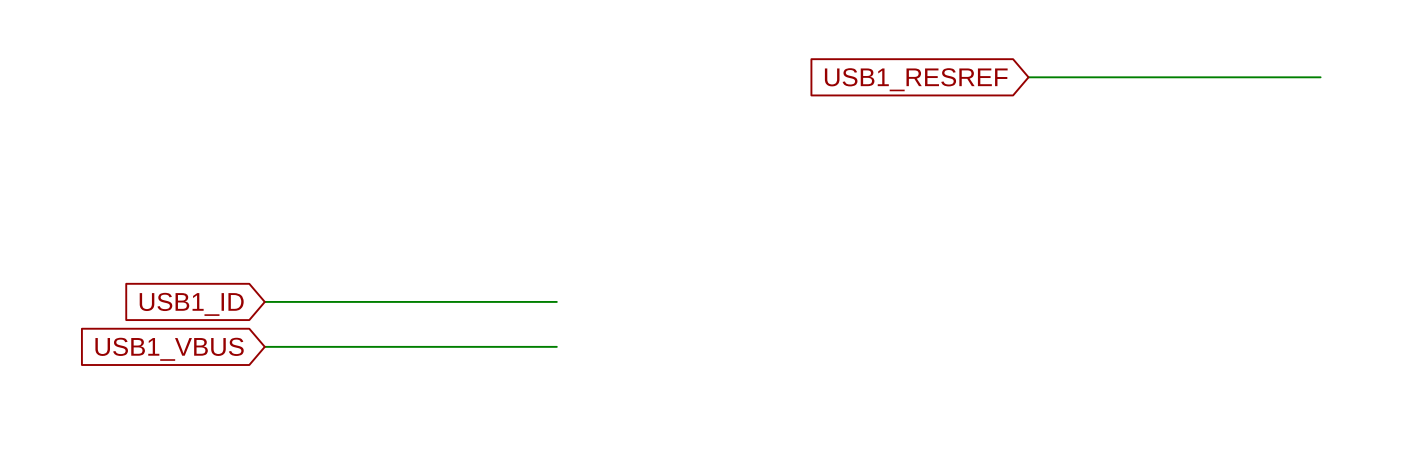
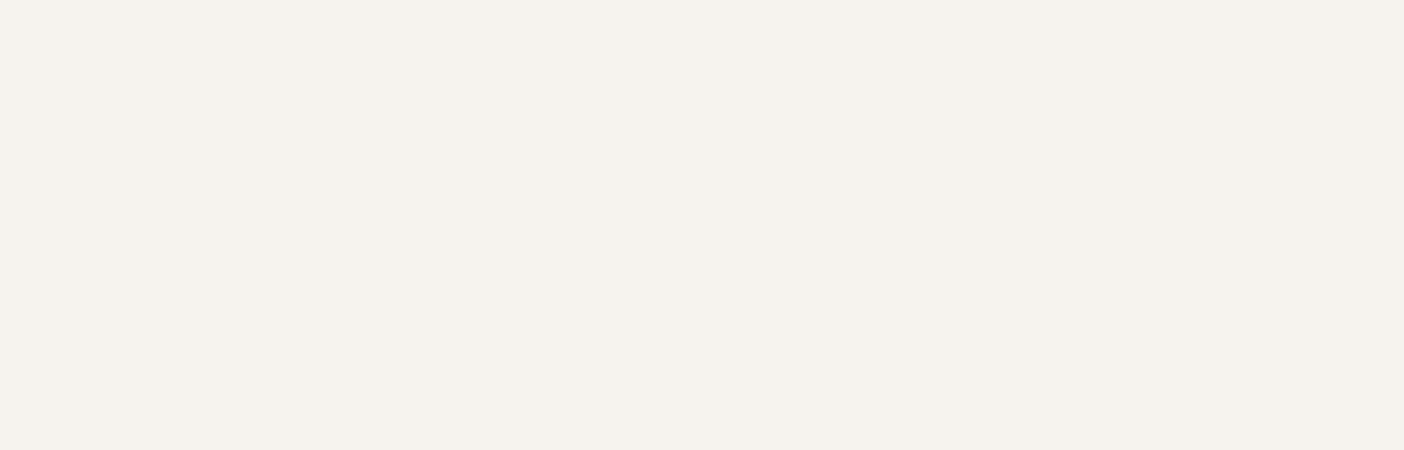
wire: (1028, 77) (1320, 77) -> none
global label: USB1_RESREF (916, 79) -> none
wire: (264, 301) (556, 301) -> none
global label: USB1_ID (191, 304) -> none
wire: (264, 346) (556, 346) -> none
global label: USB1_VBUS (169, 349) -> none

